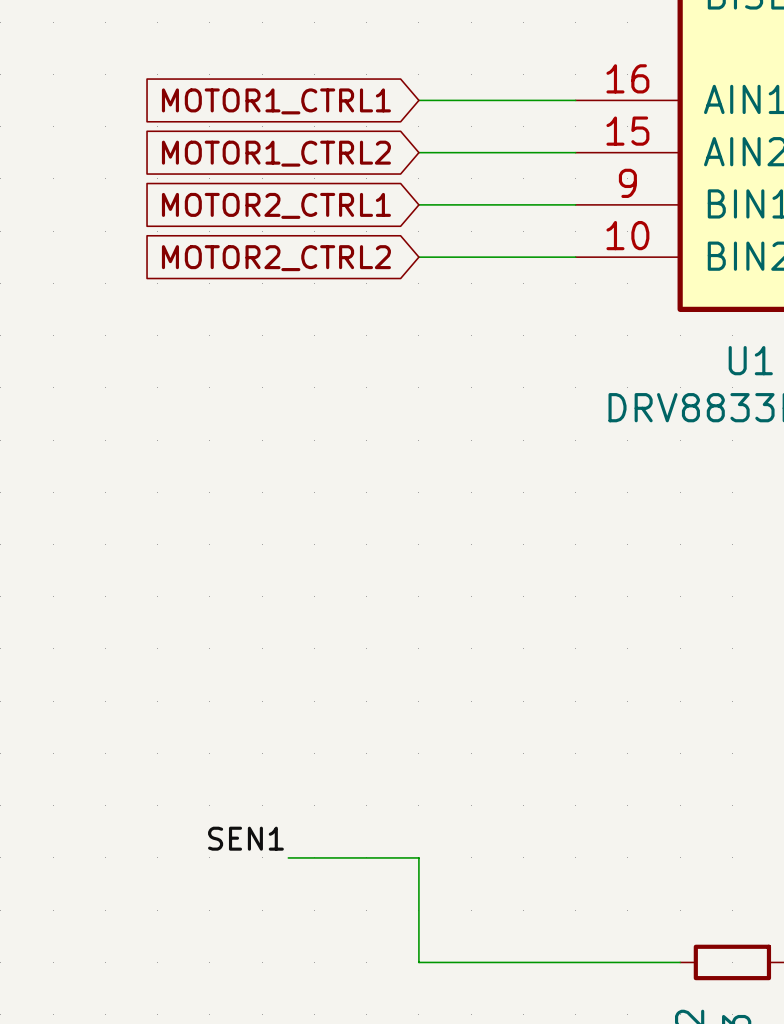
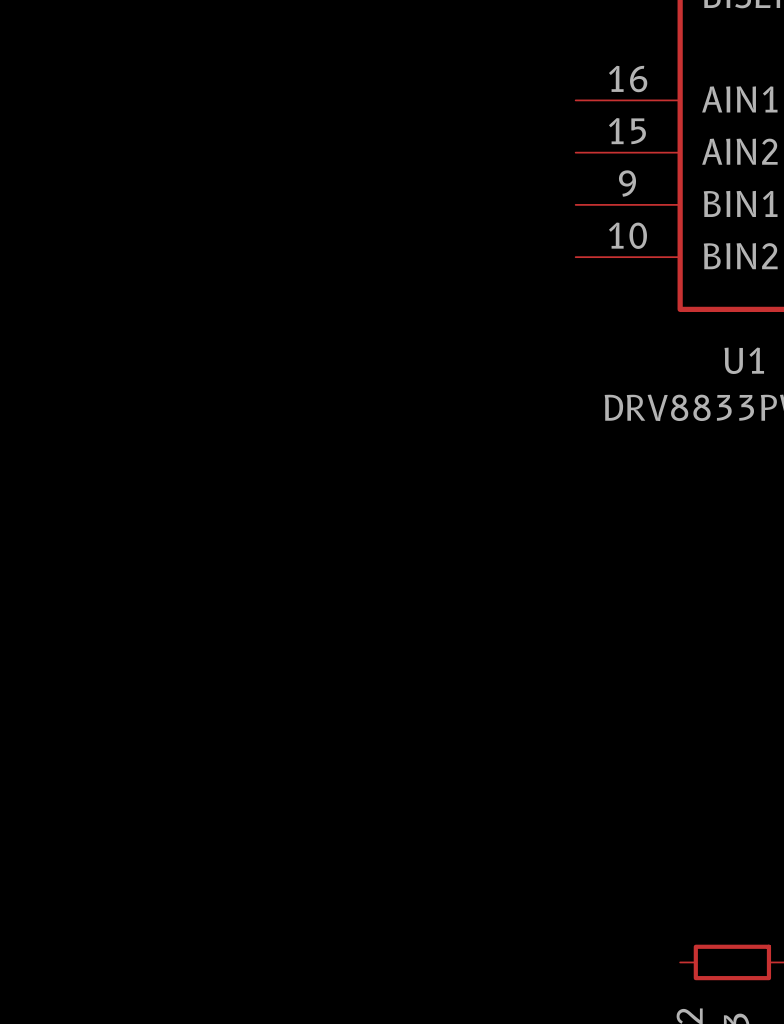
wire: (418, 100) (575, 100) -> none
global label: MOTOR1_CTRL1 (276, 101) -> none
wire: (418, 152) (575, 152) -> none
global label: MOTOR1_CTRL2 (276, 153) -> none
wire: (418, 204) (575, 204) -> none
global label: MOTOR2_CTRL1 (276, 205) -> none
wire: (418, 257) (575, 257) -> none
global label: MOTOR2_CTRL2 (276, 258) -> none
label: SEN1 (245, 838) -> none
wire: (288, 857) (418, 857) (418, 962) (680, 962) -> none

